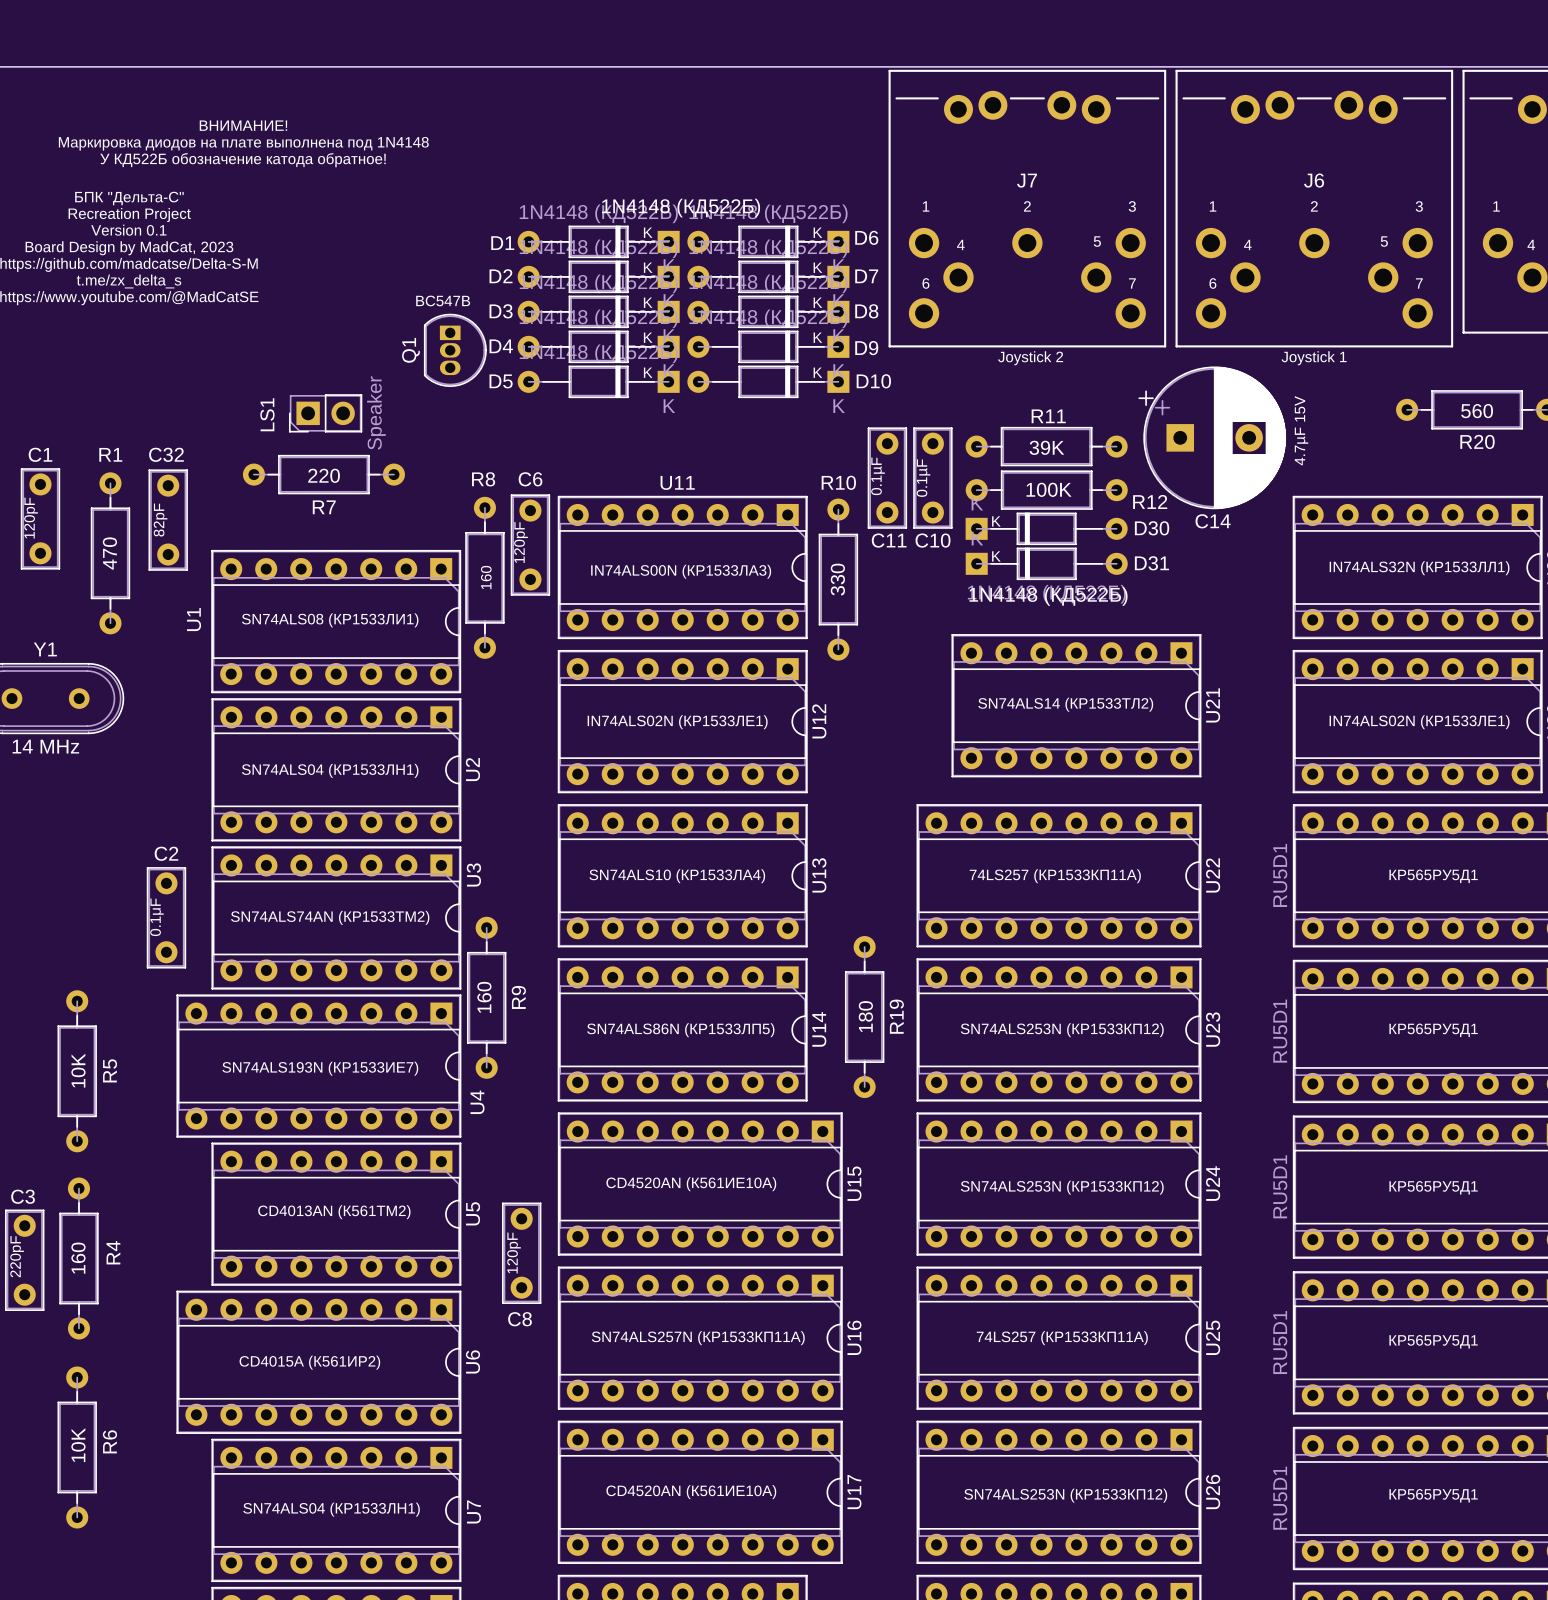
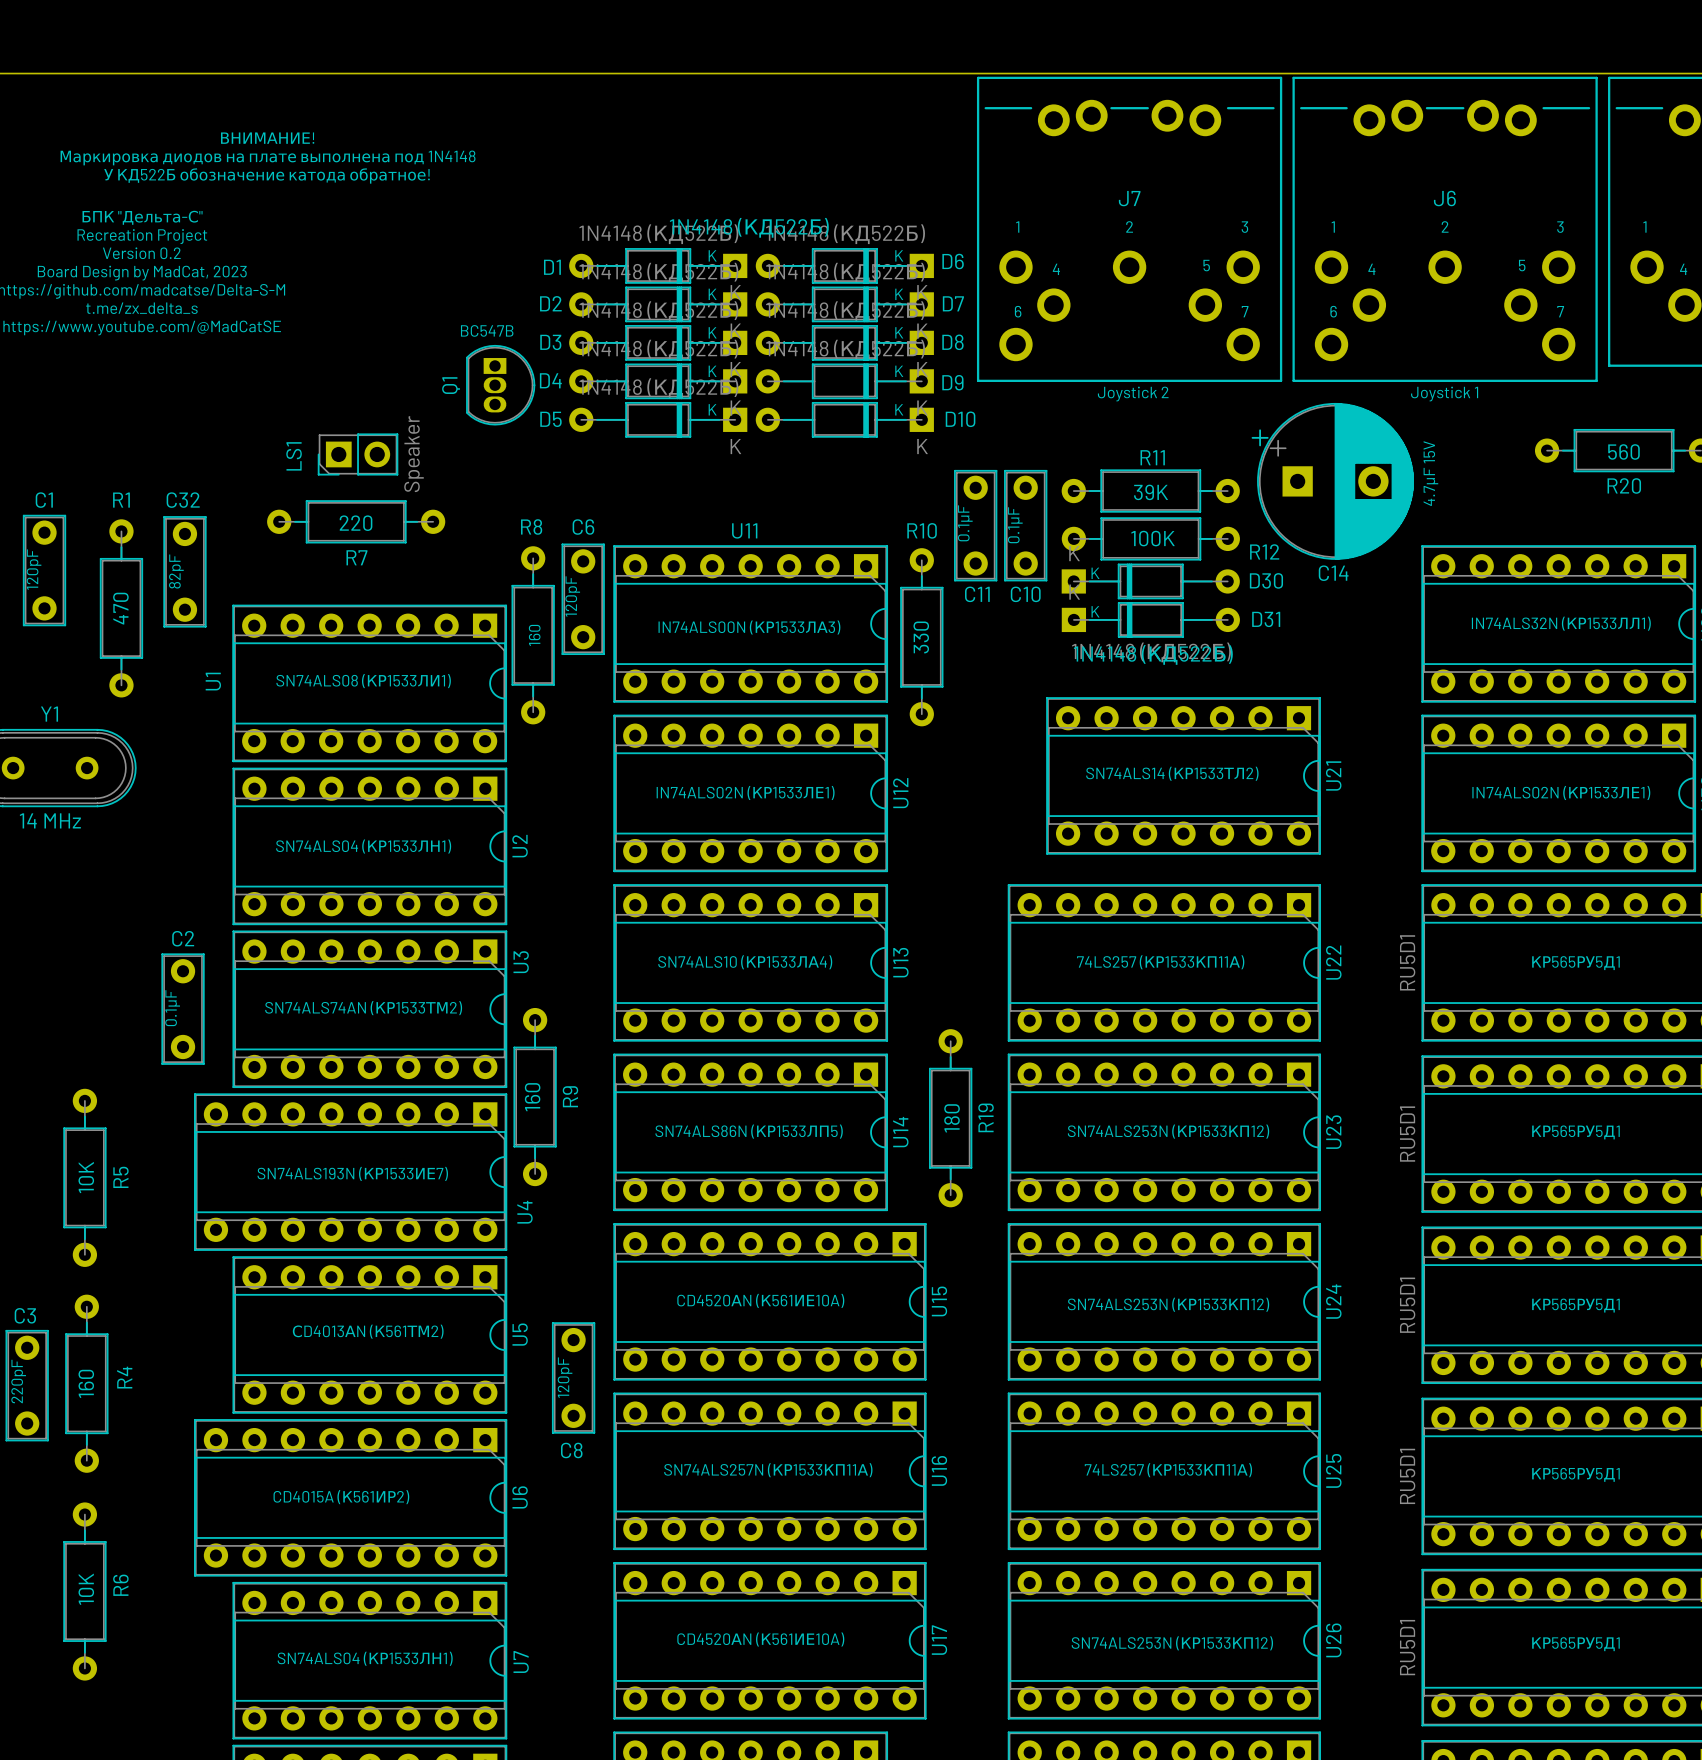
text: Version 0.1 (128, 230) -> Version 0.2 (141, 253)

